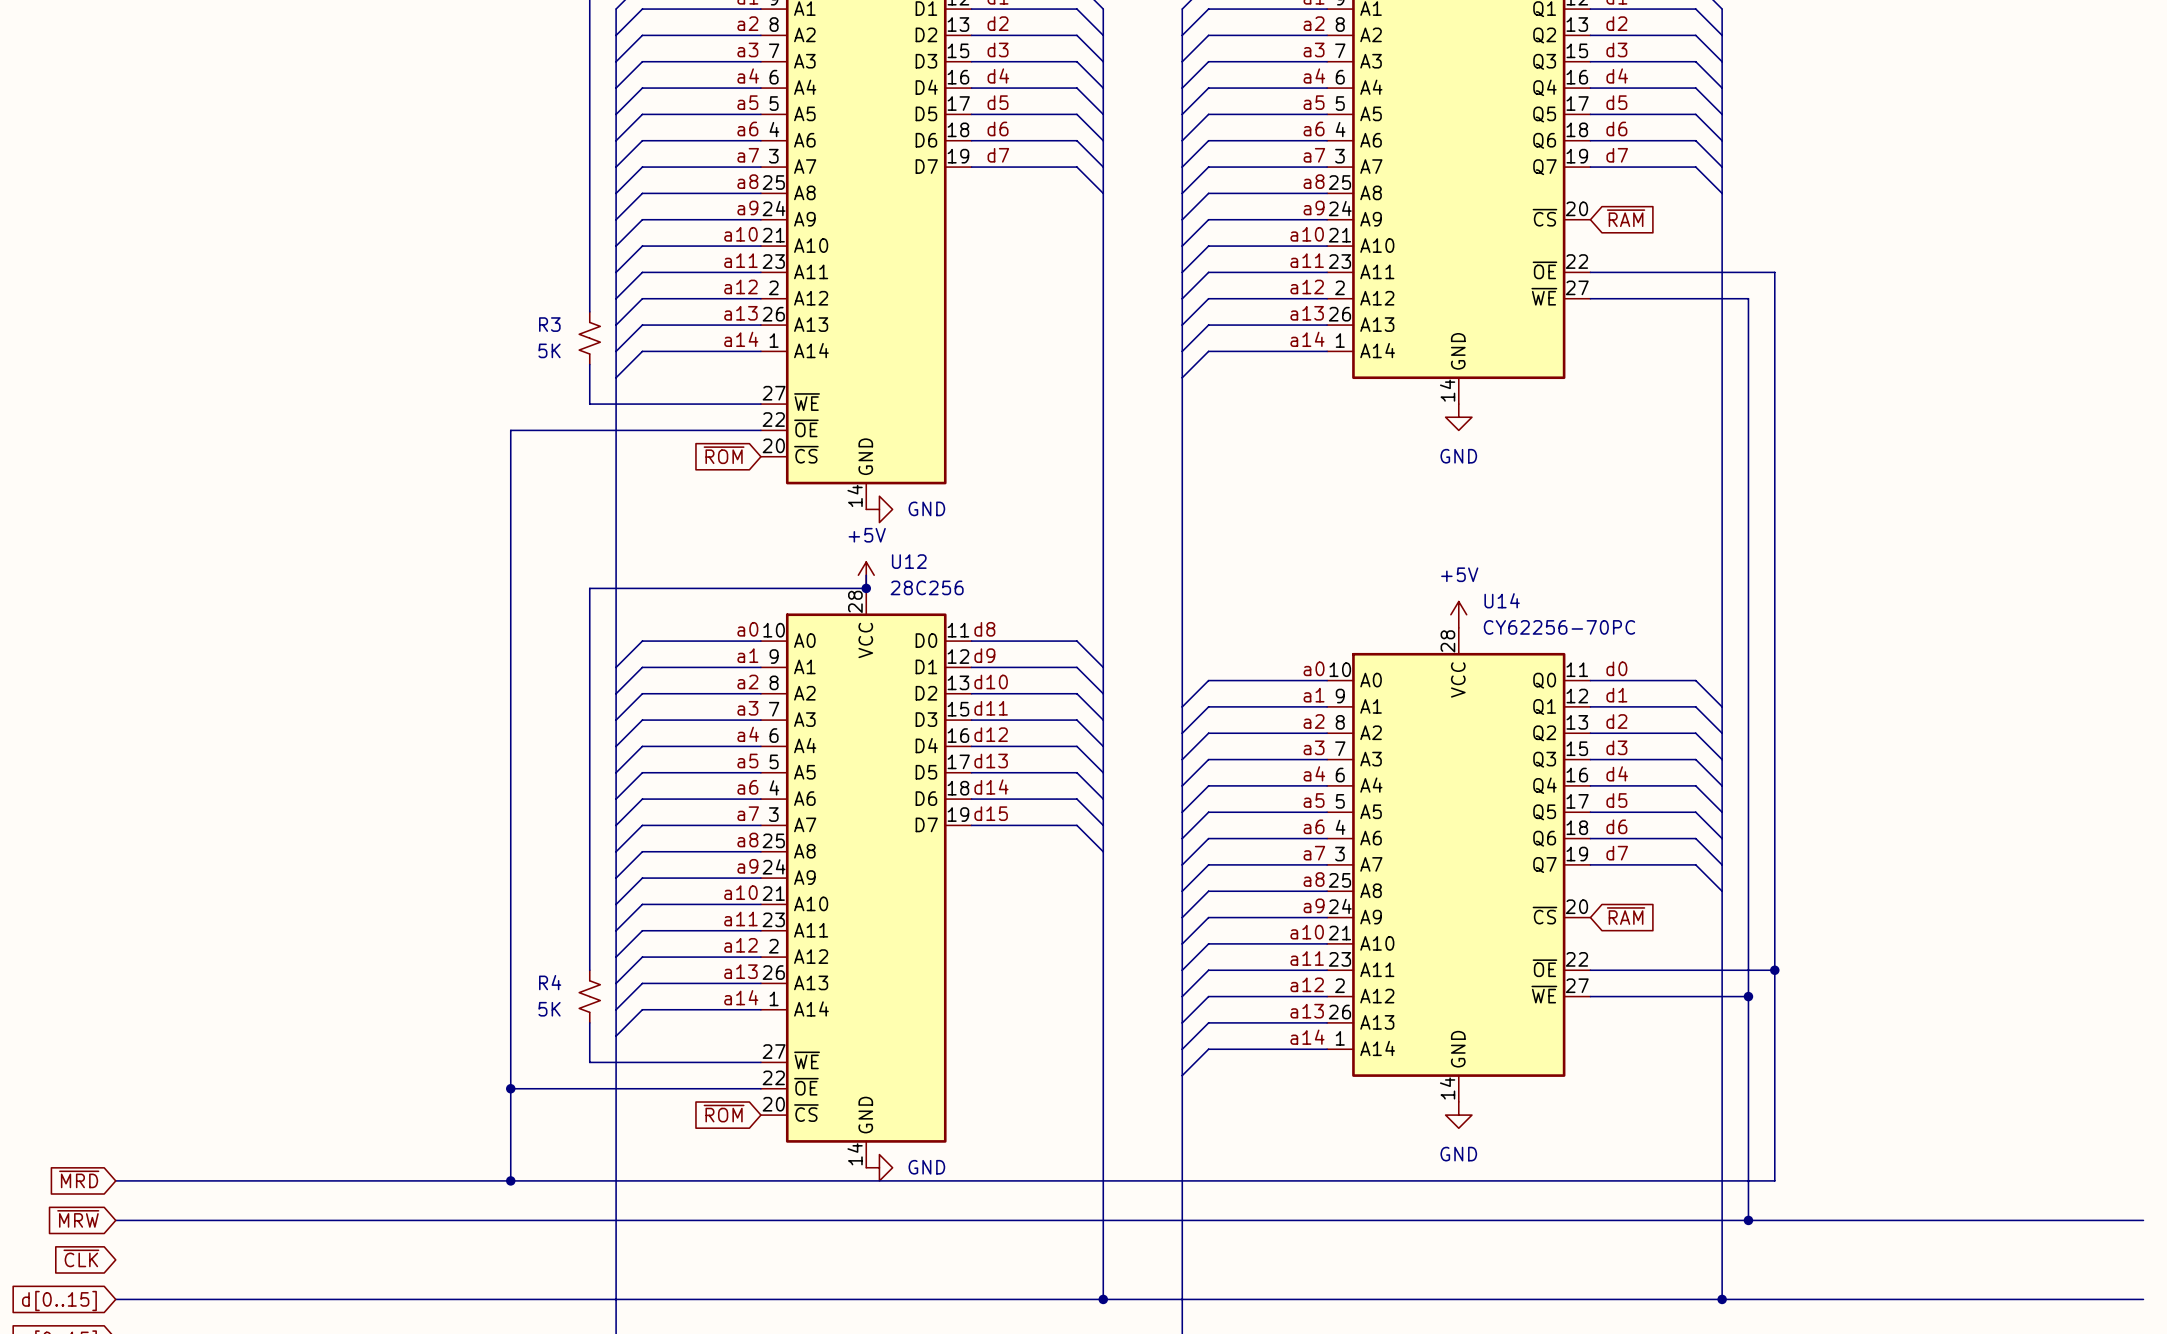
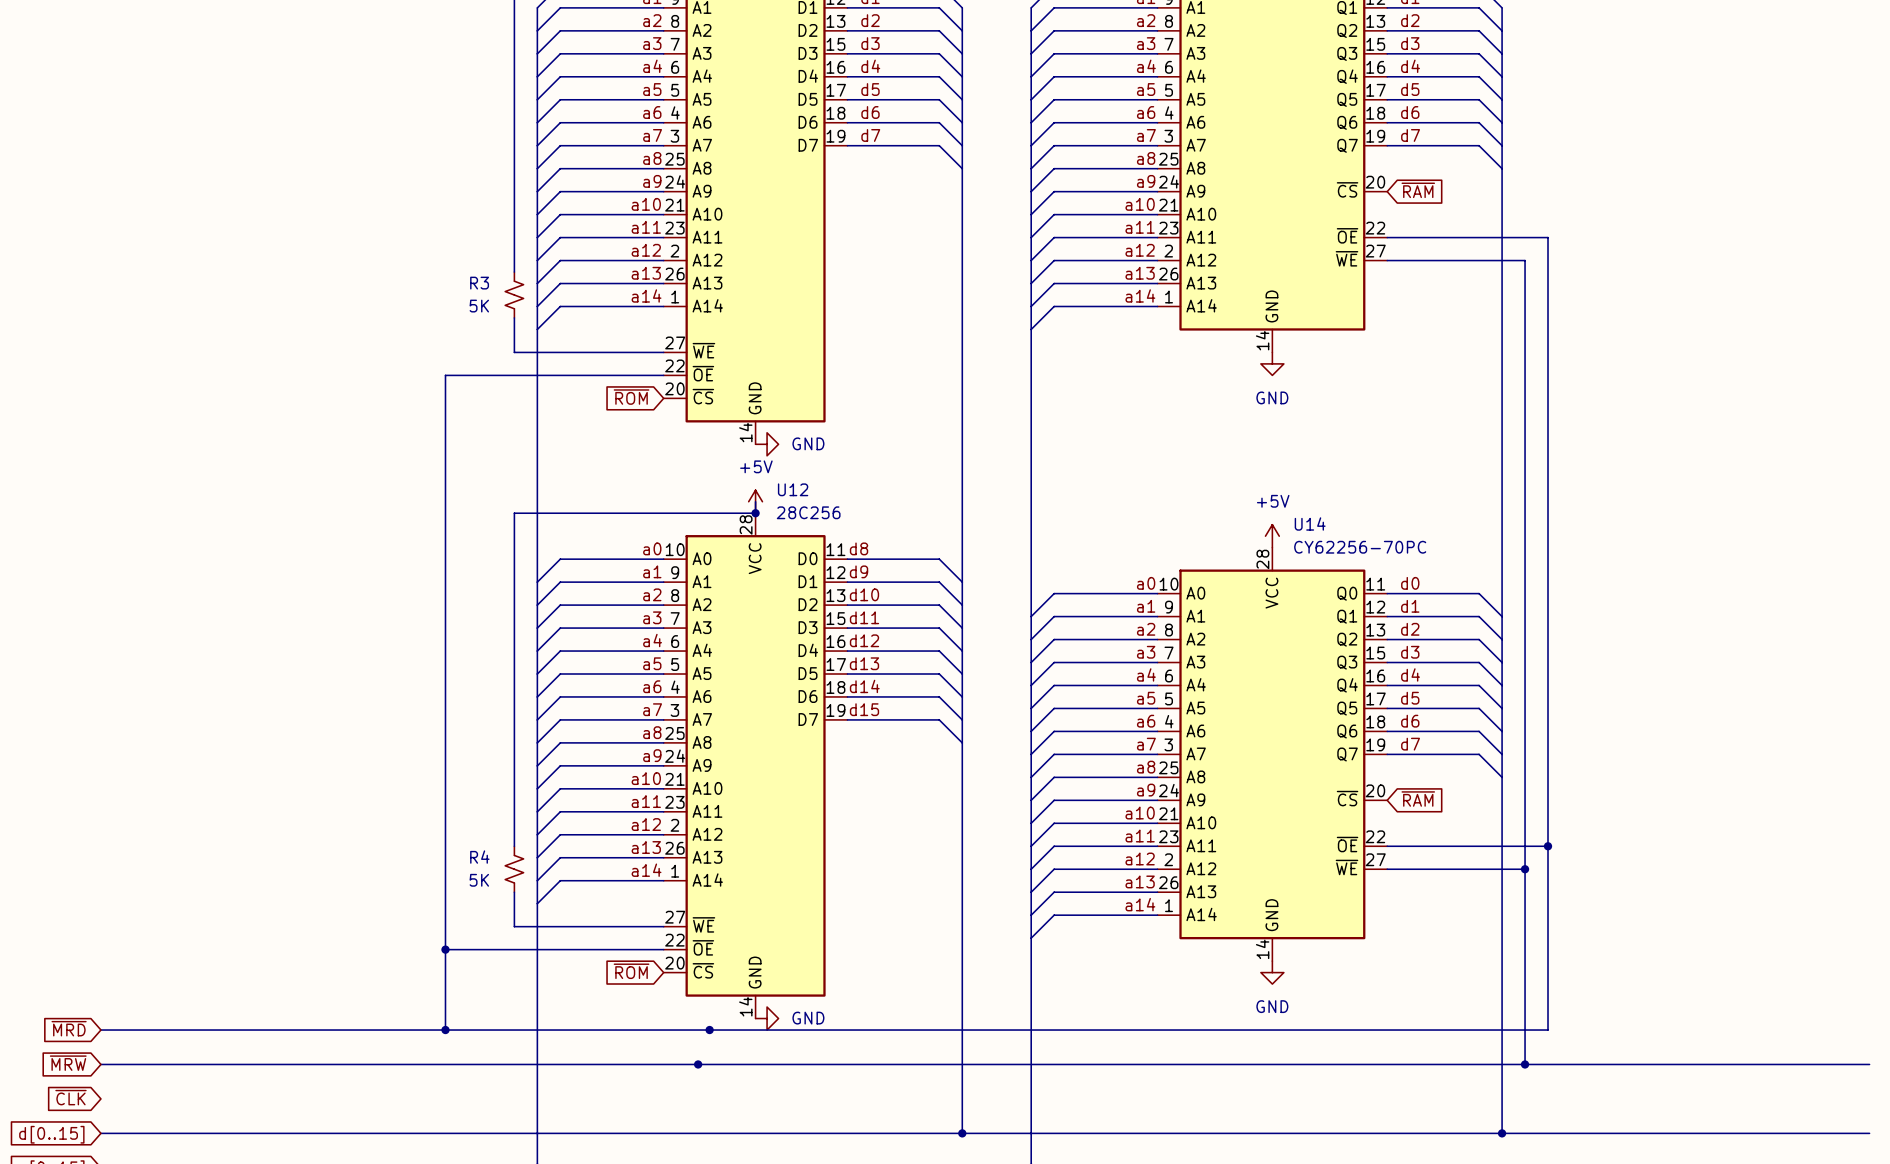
junction: none -> (709, 1030)
junction: none -> (698, 1064)

